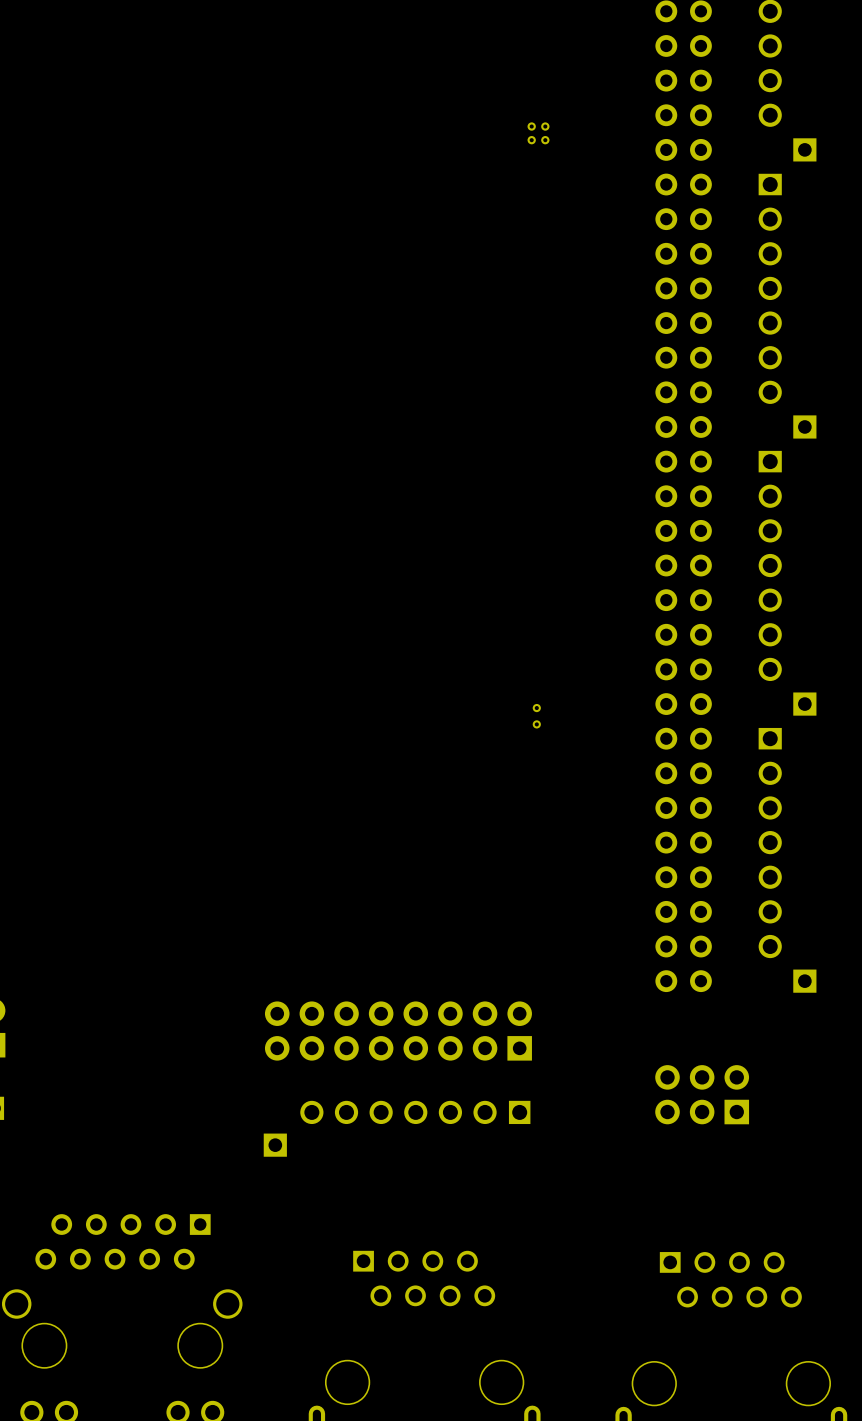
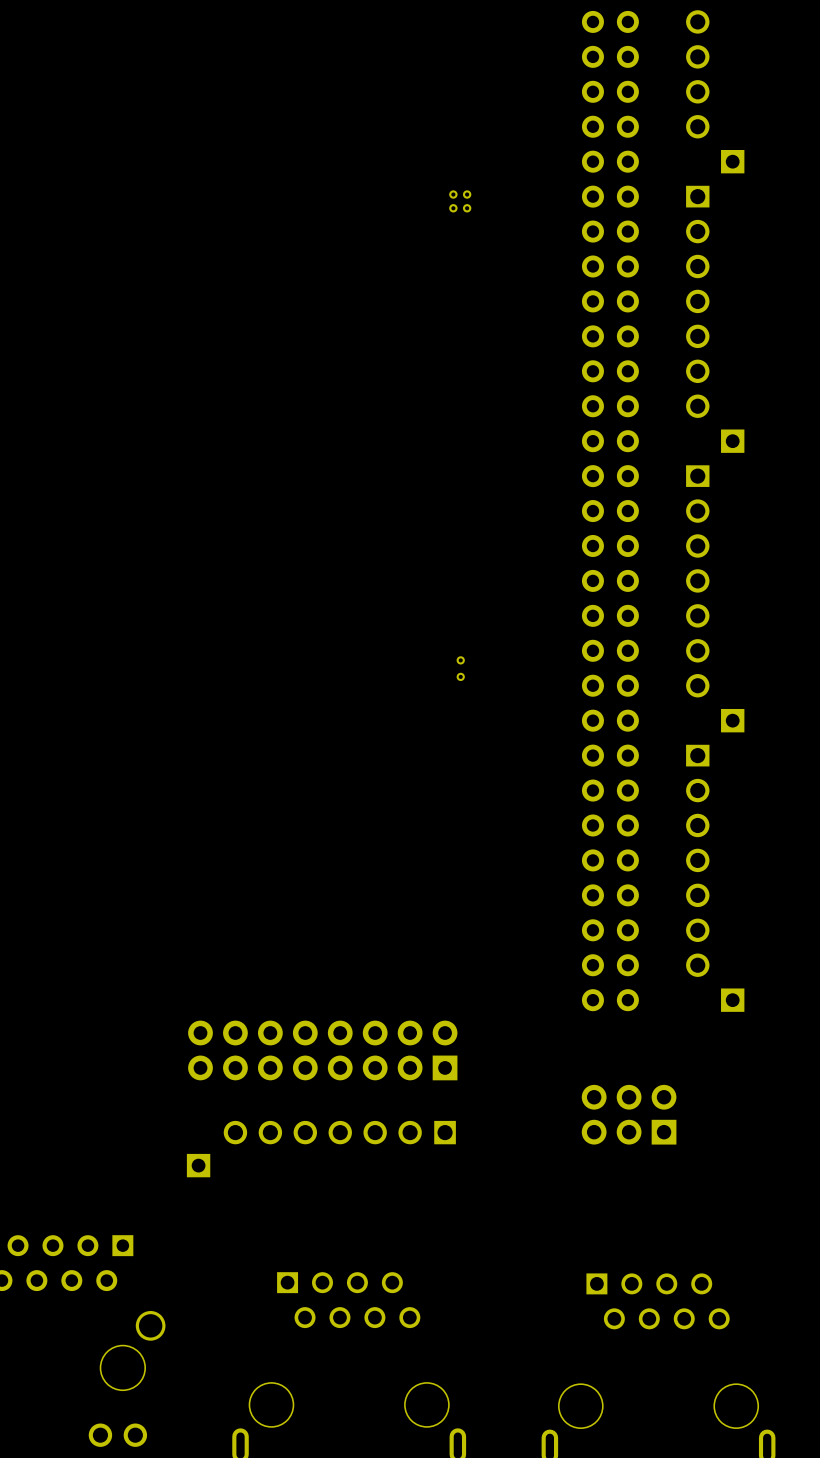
part position: (538, 133) -> (460, 201)
part position: (536, 716) -> (460, 668)

